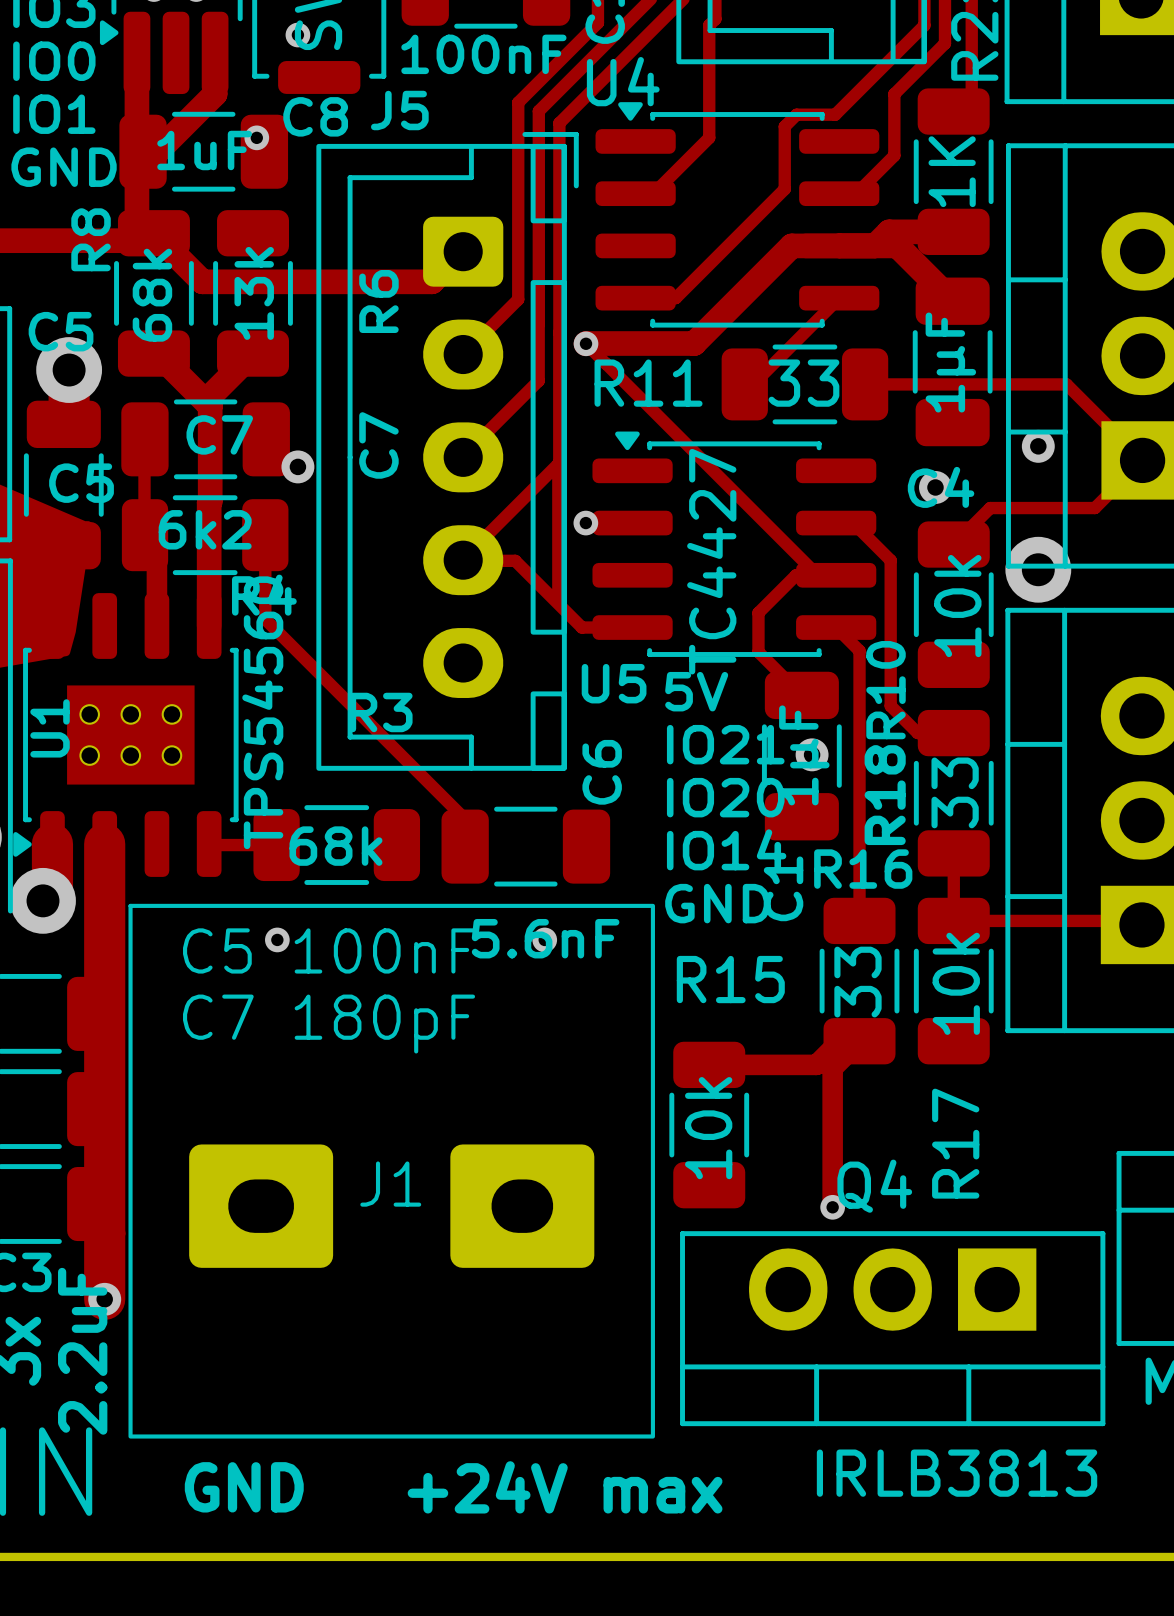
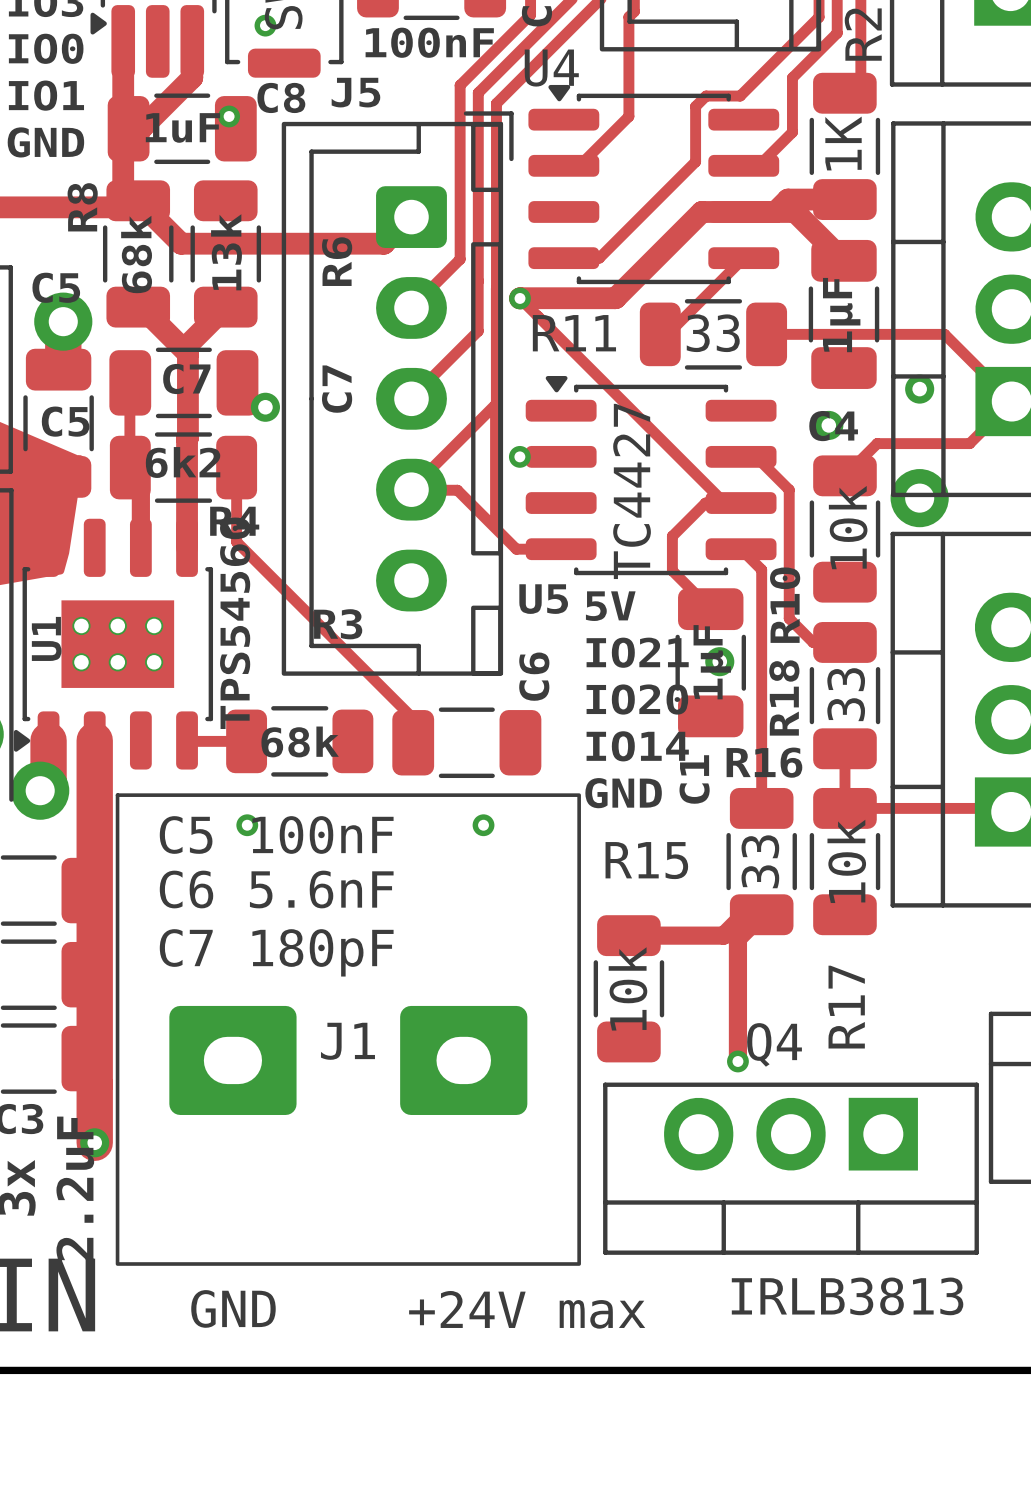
C6 value: 5.6nF (545, 938) -> none
text: none -> C6 5.6nF (276, 889)
text position: C7 180pF (329, 1024) -> C7 180pF (276, 952)

